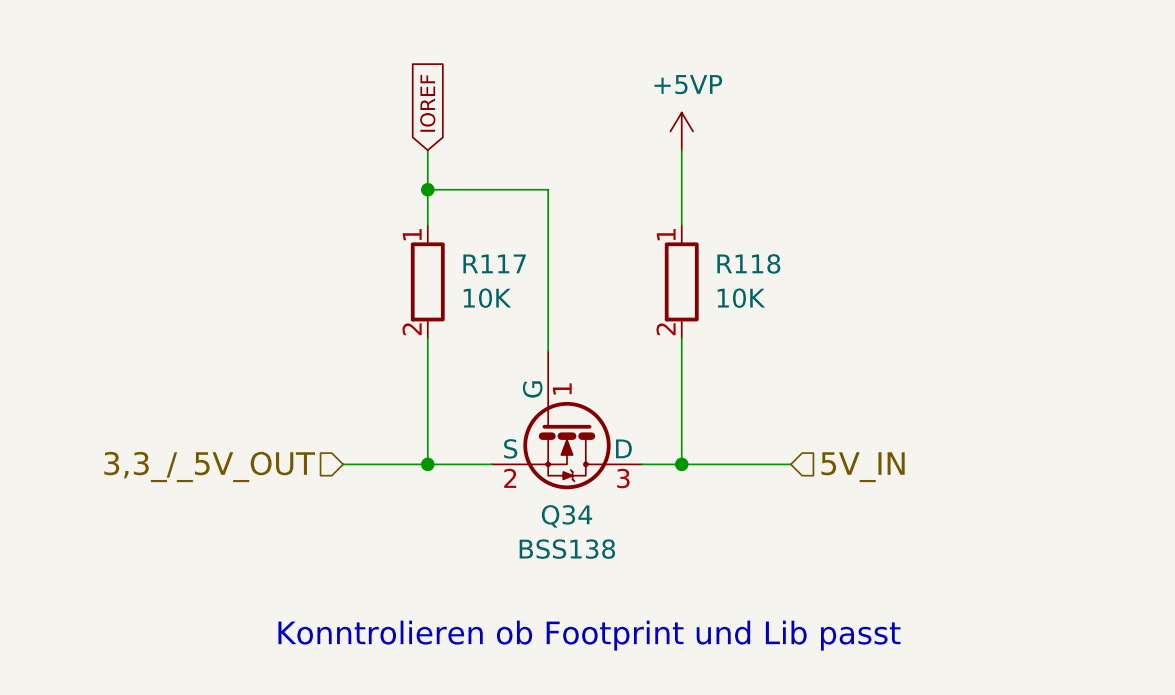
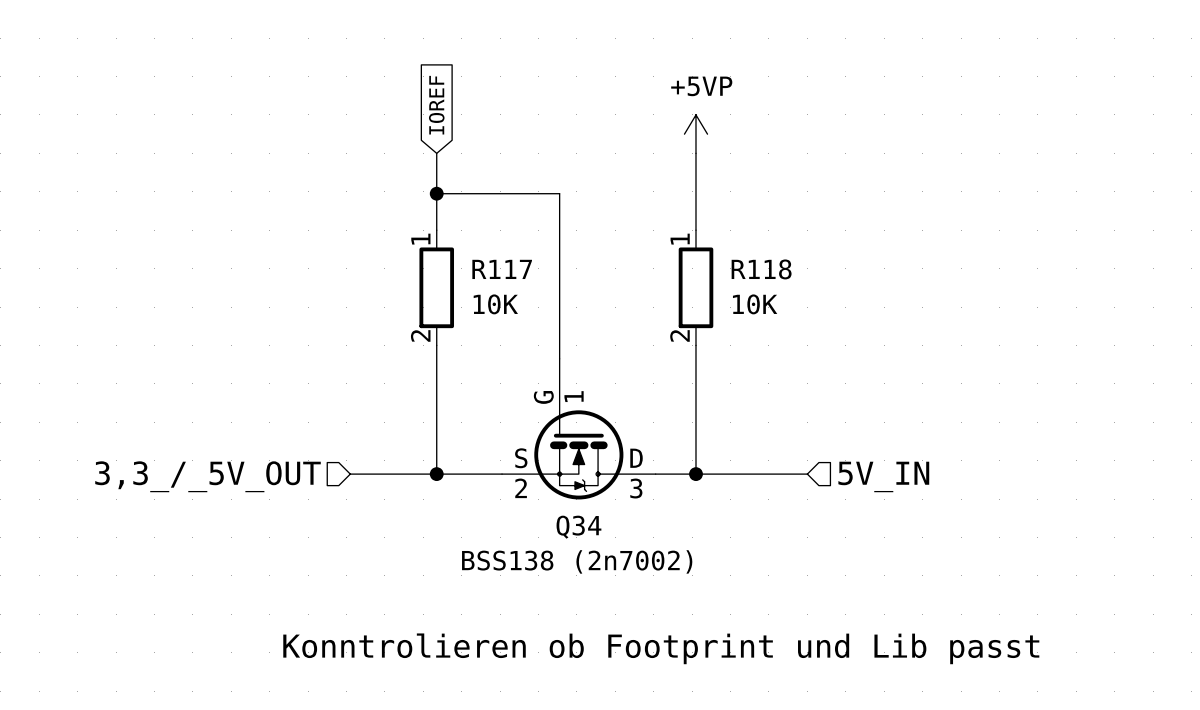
Q34 value: BSS138 (567, 549) -> BSS138 (2n7002) (577, 561)

